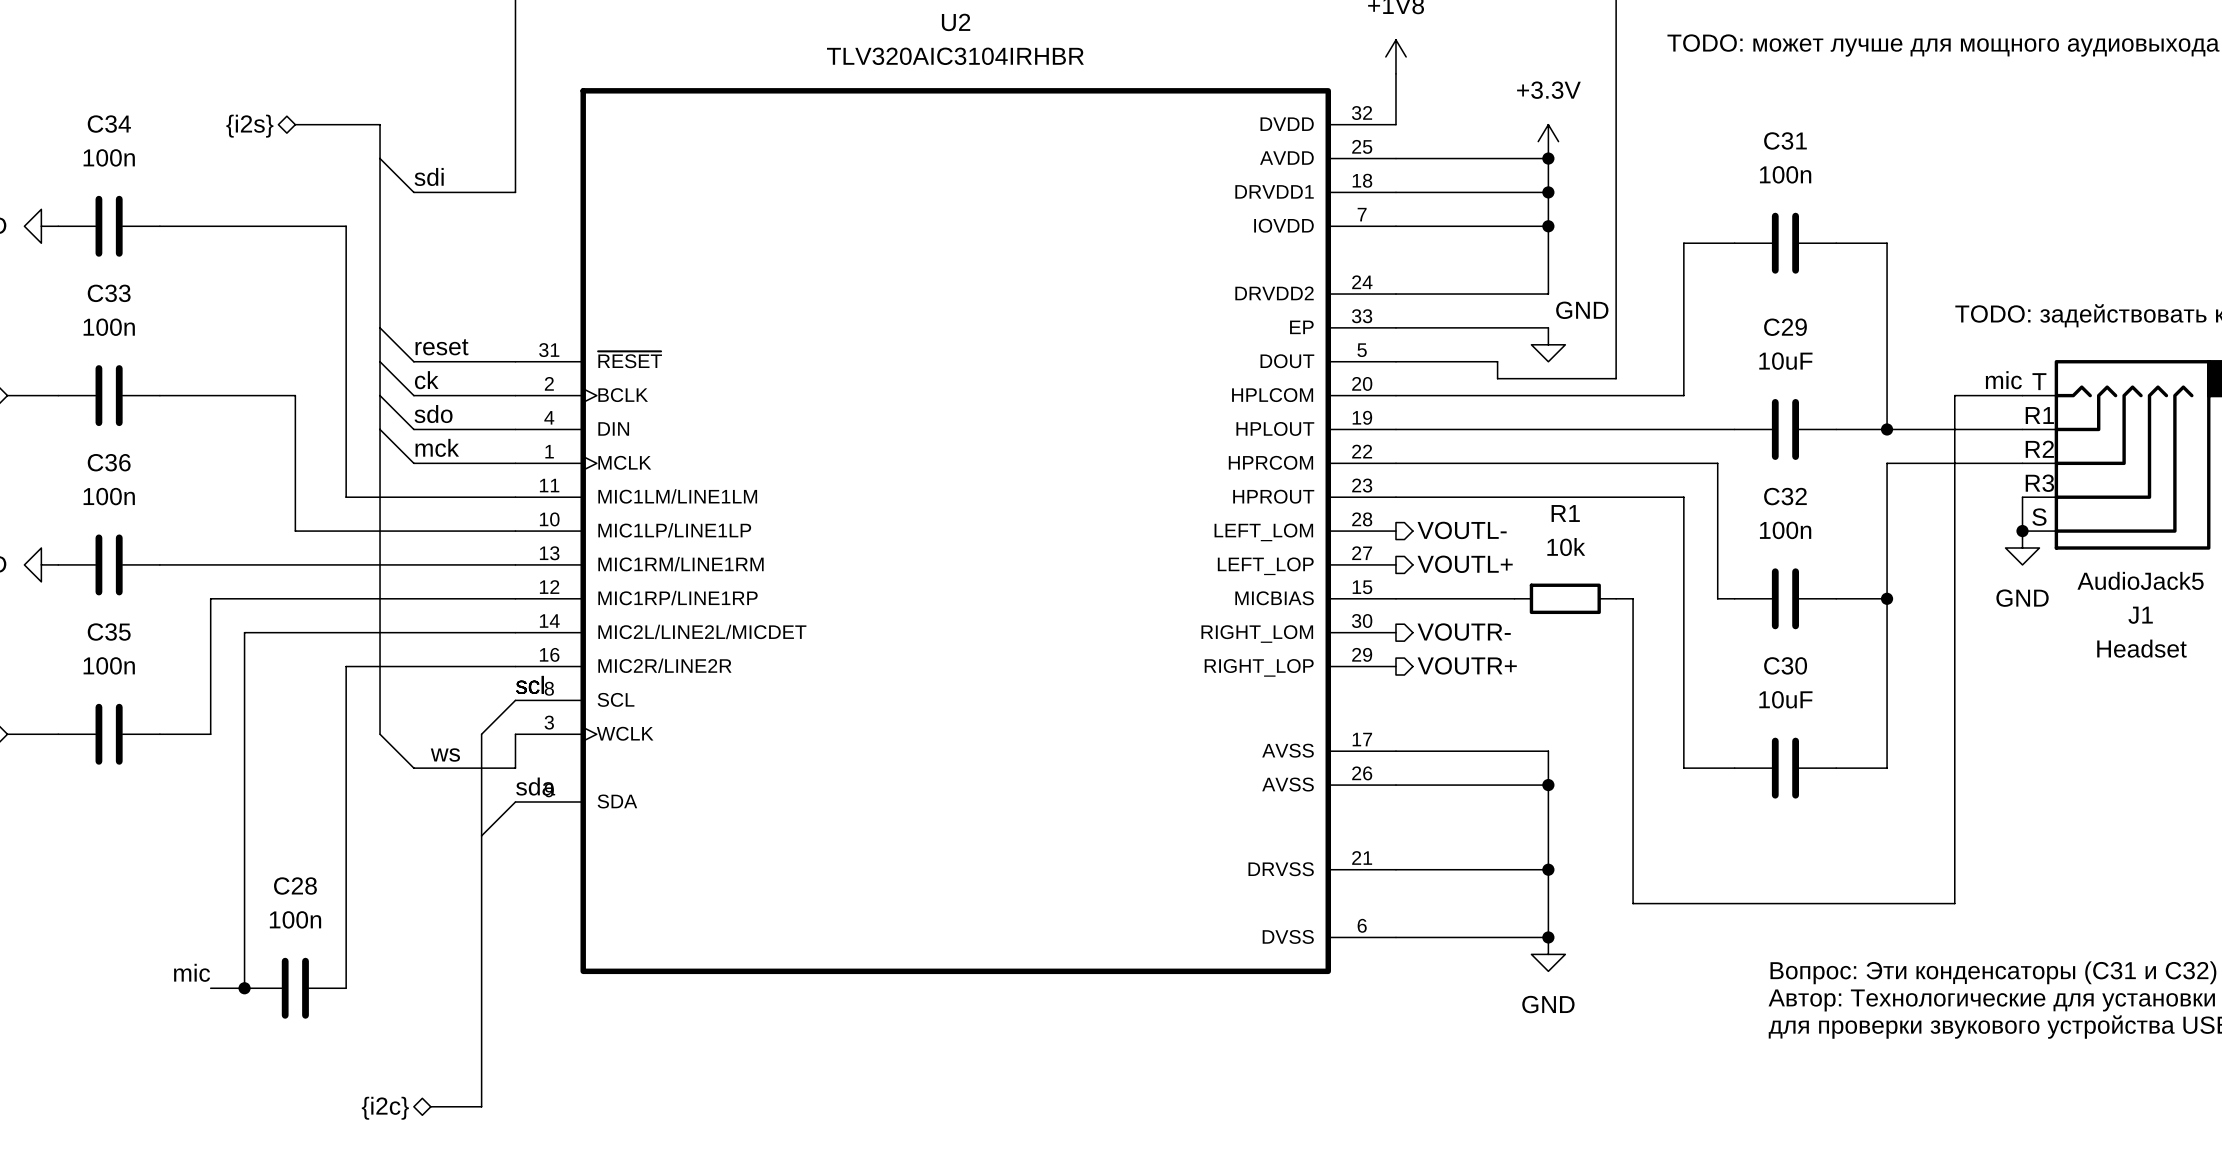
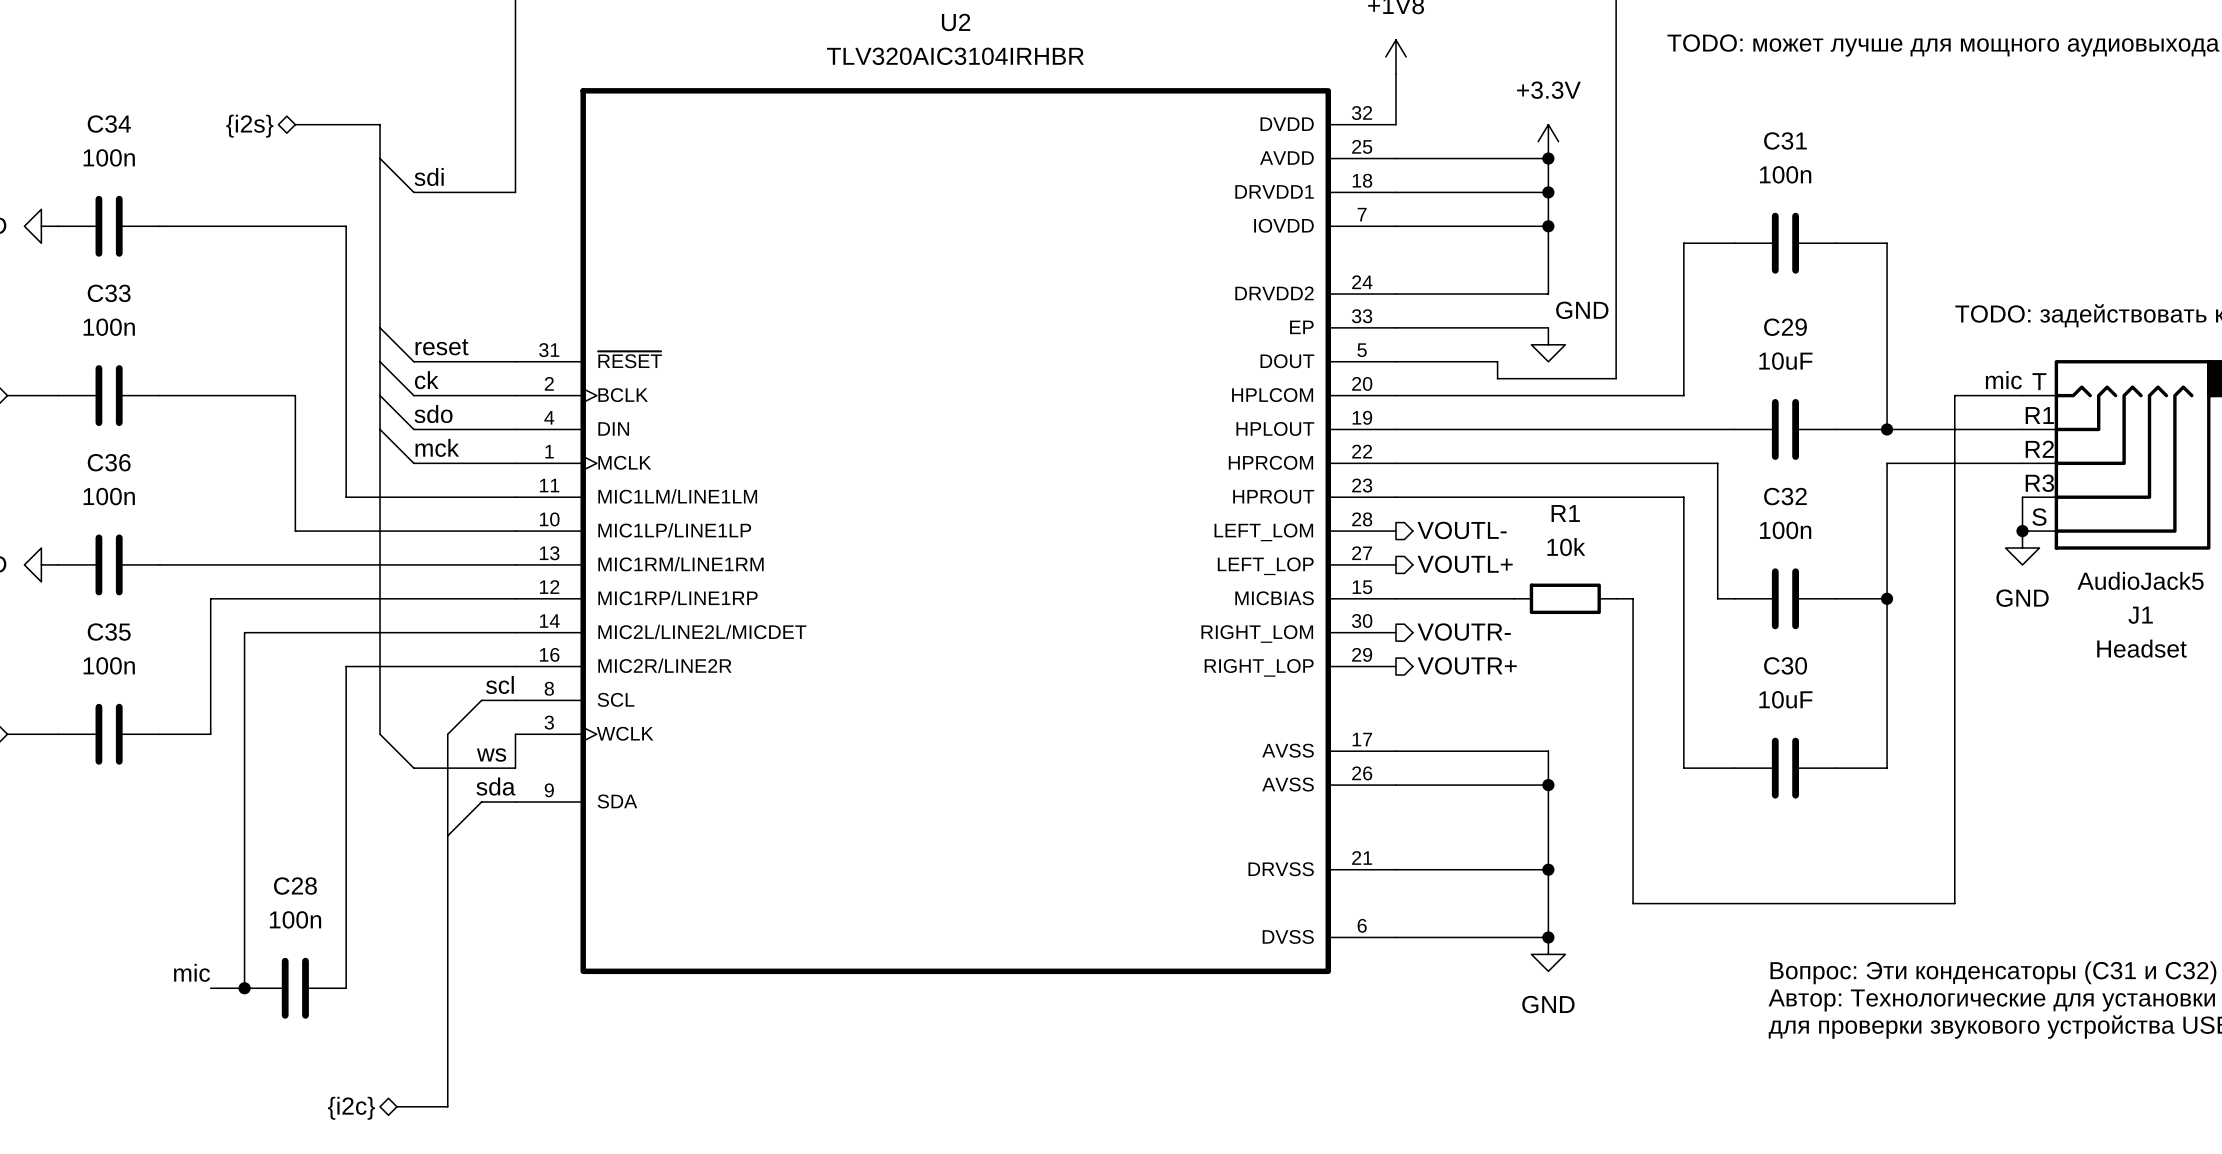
label position: scl (530, 684) -> scl (499, 684)
wire: (515, 700) (481, 734) -> (515, 700) (481, 700) (447, 734)
bus: (481, 734) (481, 1106) (447, 1106) -> (447, 734) (447, 1106)
label position: ws (445, 755) -> ws (491, 755)
label position: sda (535, 786) -> sda (495, 786)
wire: (515, 801) (481, 835) -> (515, 801) (481, 801) (447, 835)
bus: none -> (396, 1106) (430, 1106)
hierarchical label position: {i2c} (385, 1108) -> {i2c} (351, 1108)

